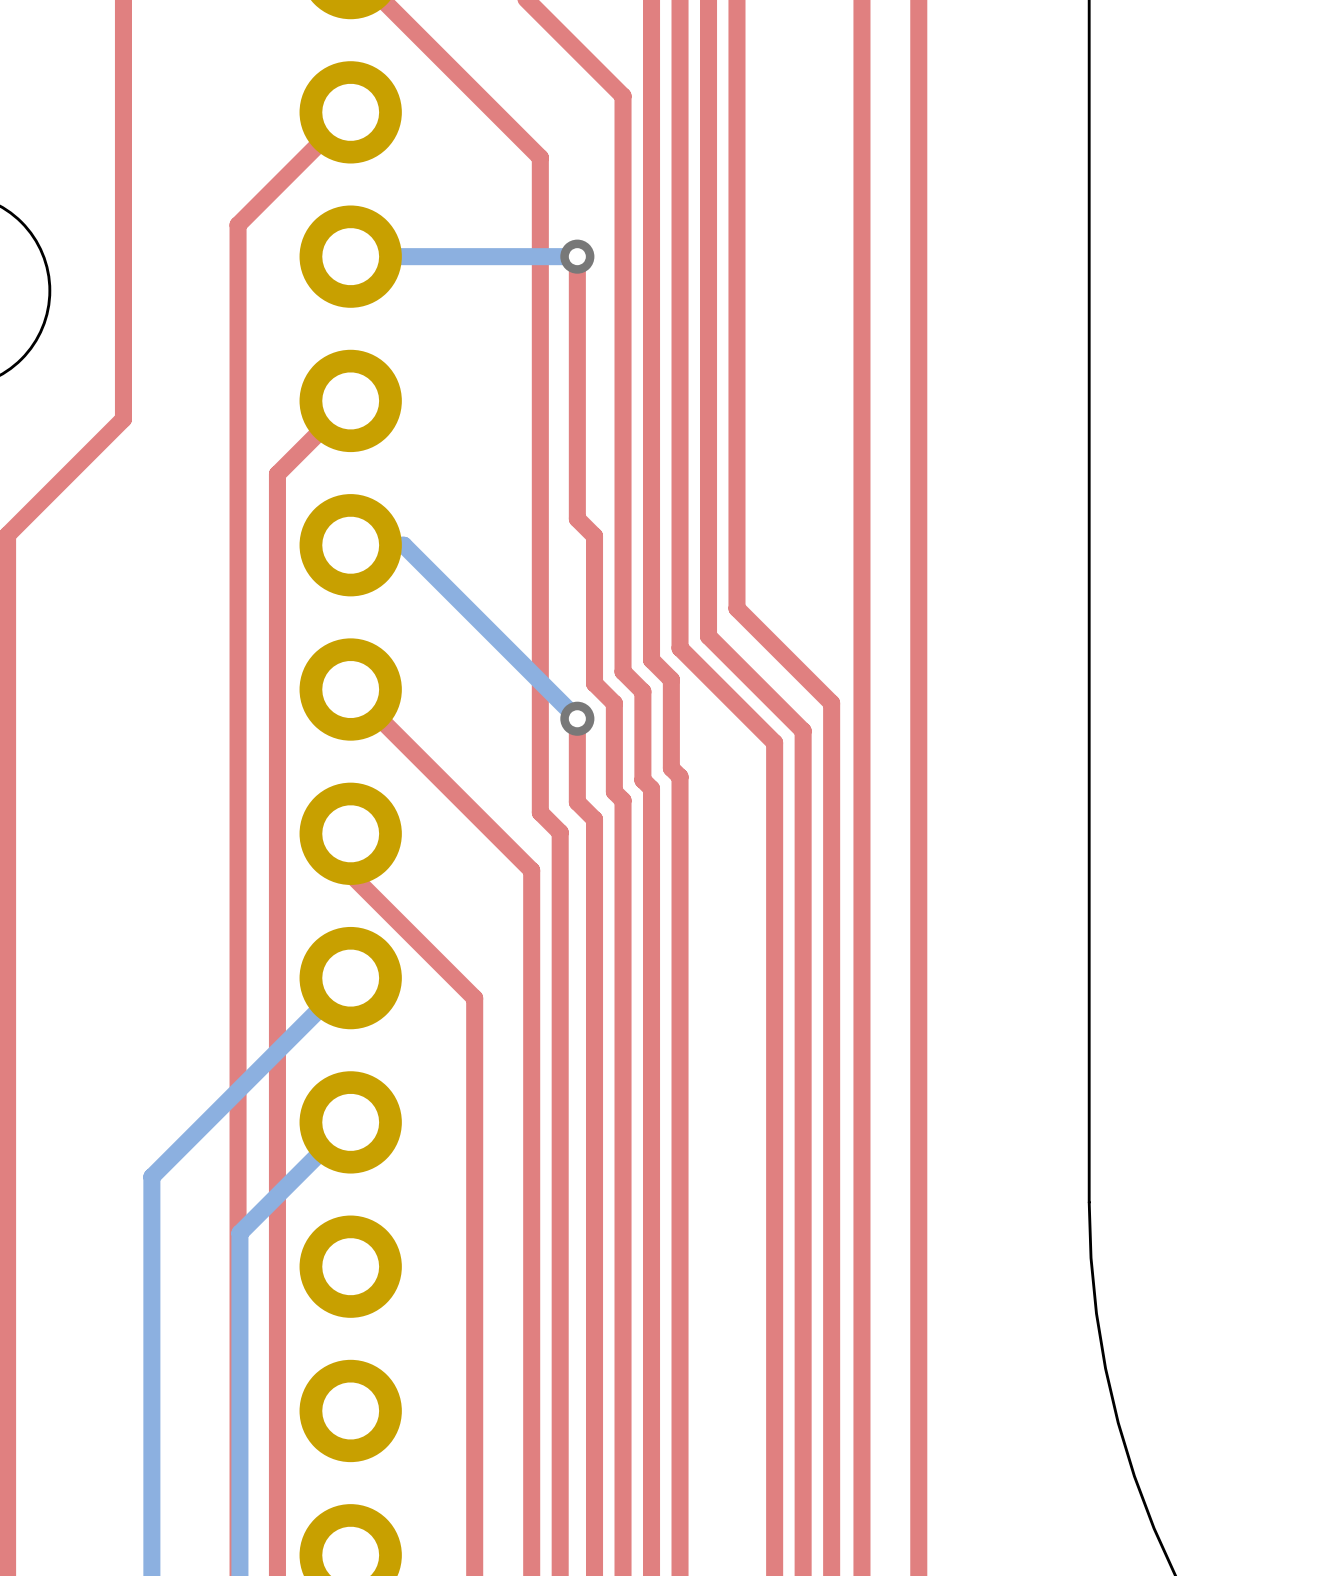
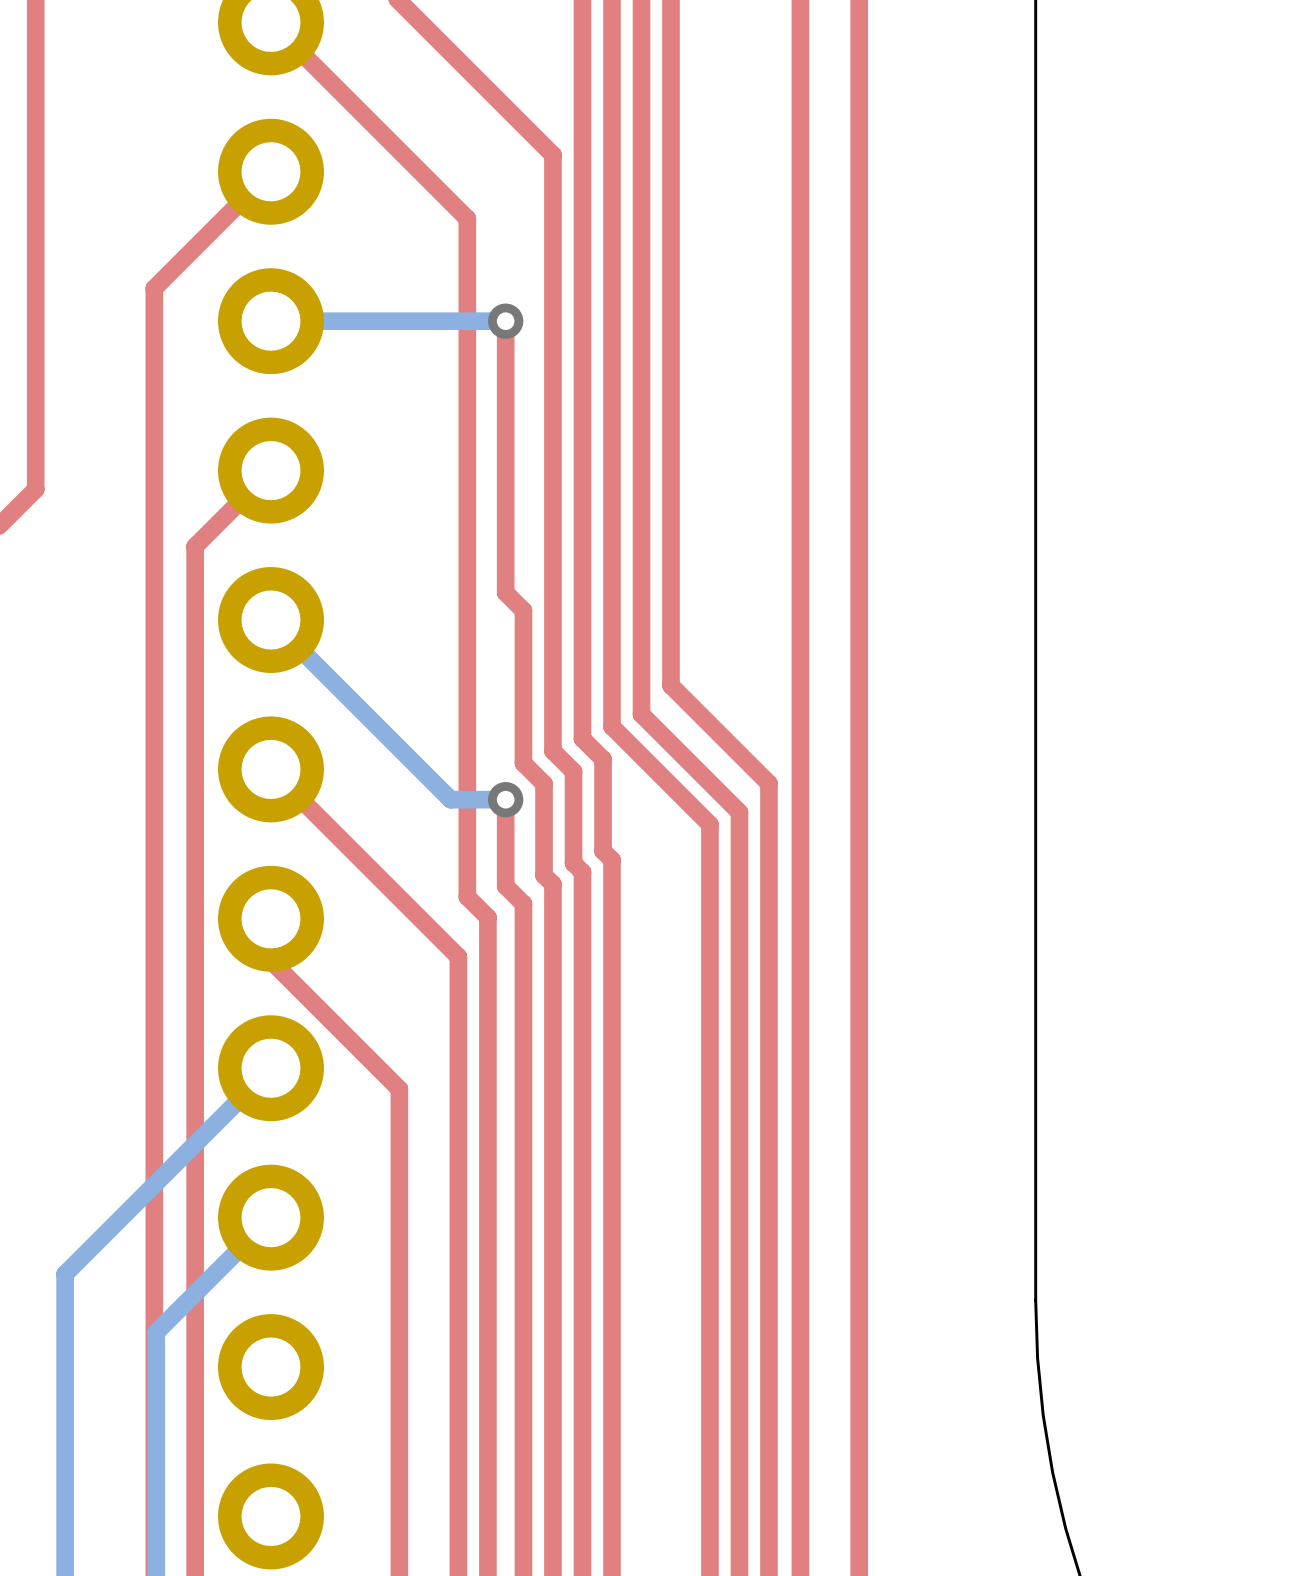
bottom track: (350, 545) (403, 545) (577, 718) -> (270, 620) (450, 799) (505, 799)

